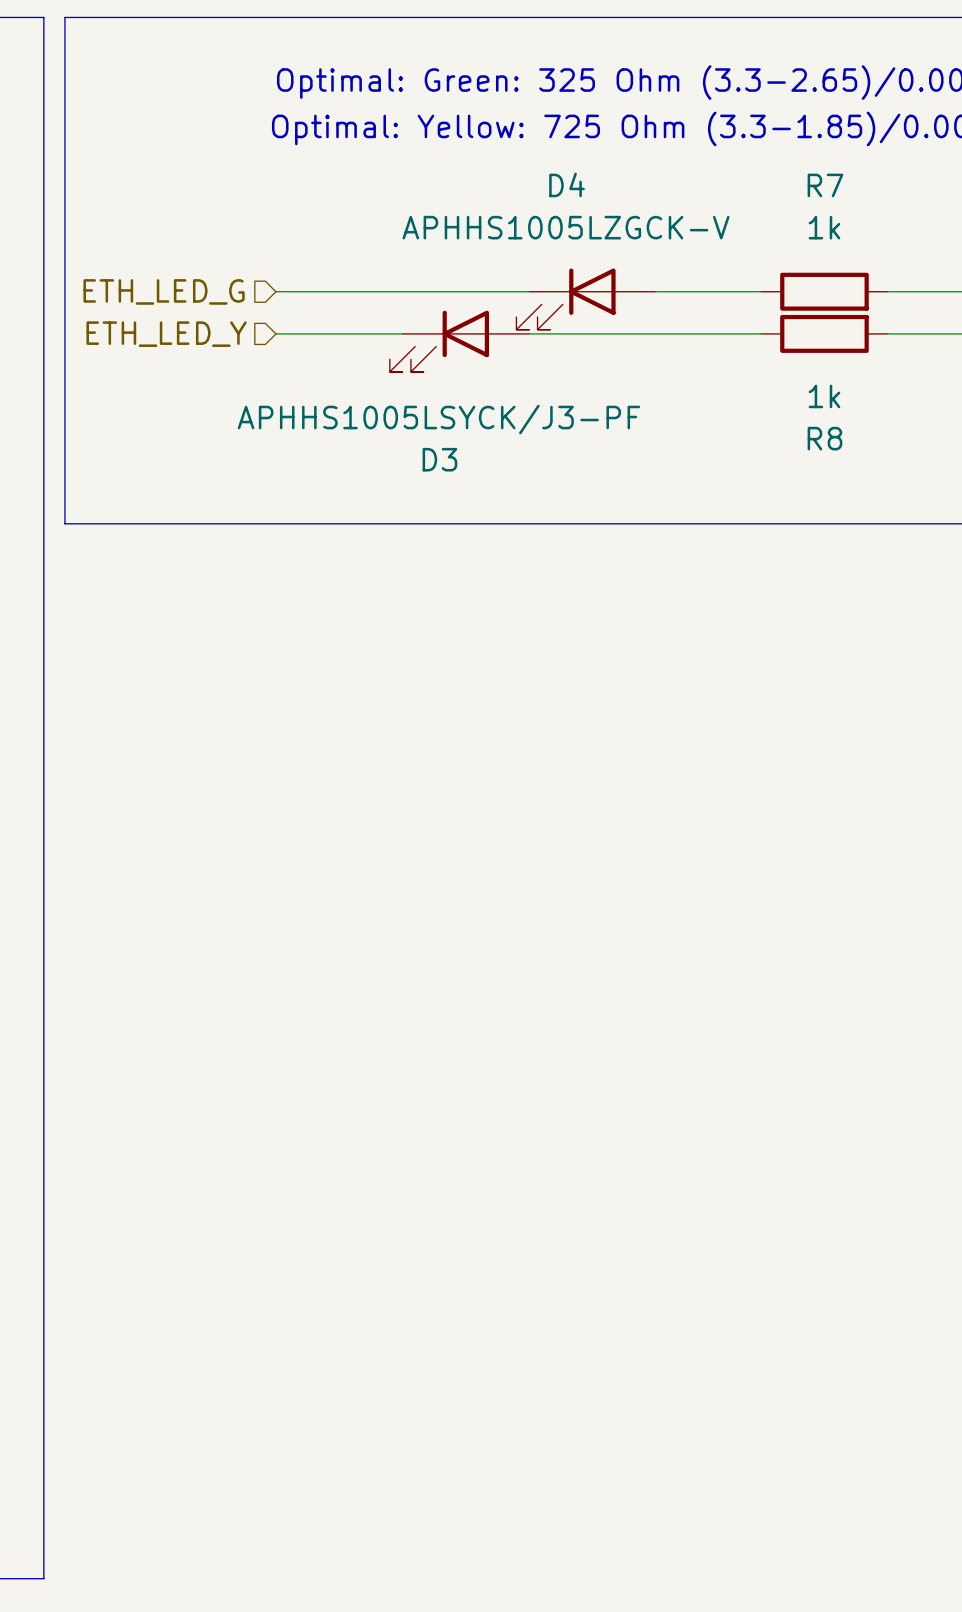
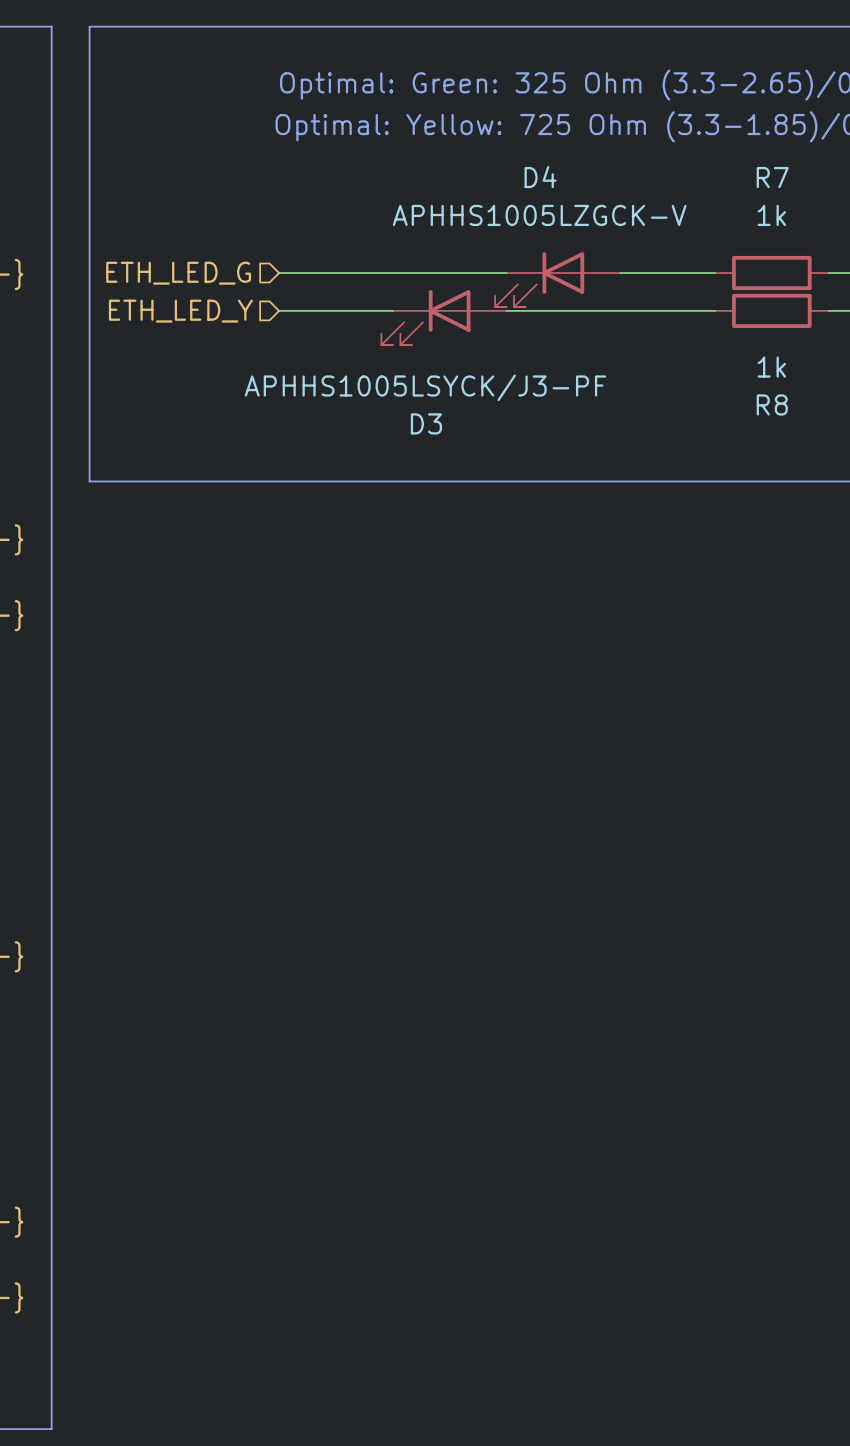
line: (22, 17) (43, 17) (43, 1578) (22, 1578) -> (51, 26) (51, 1429)

